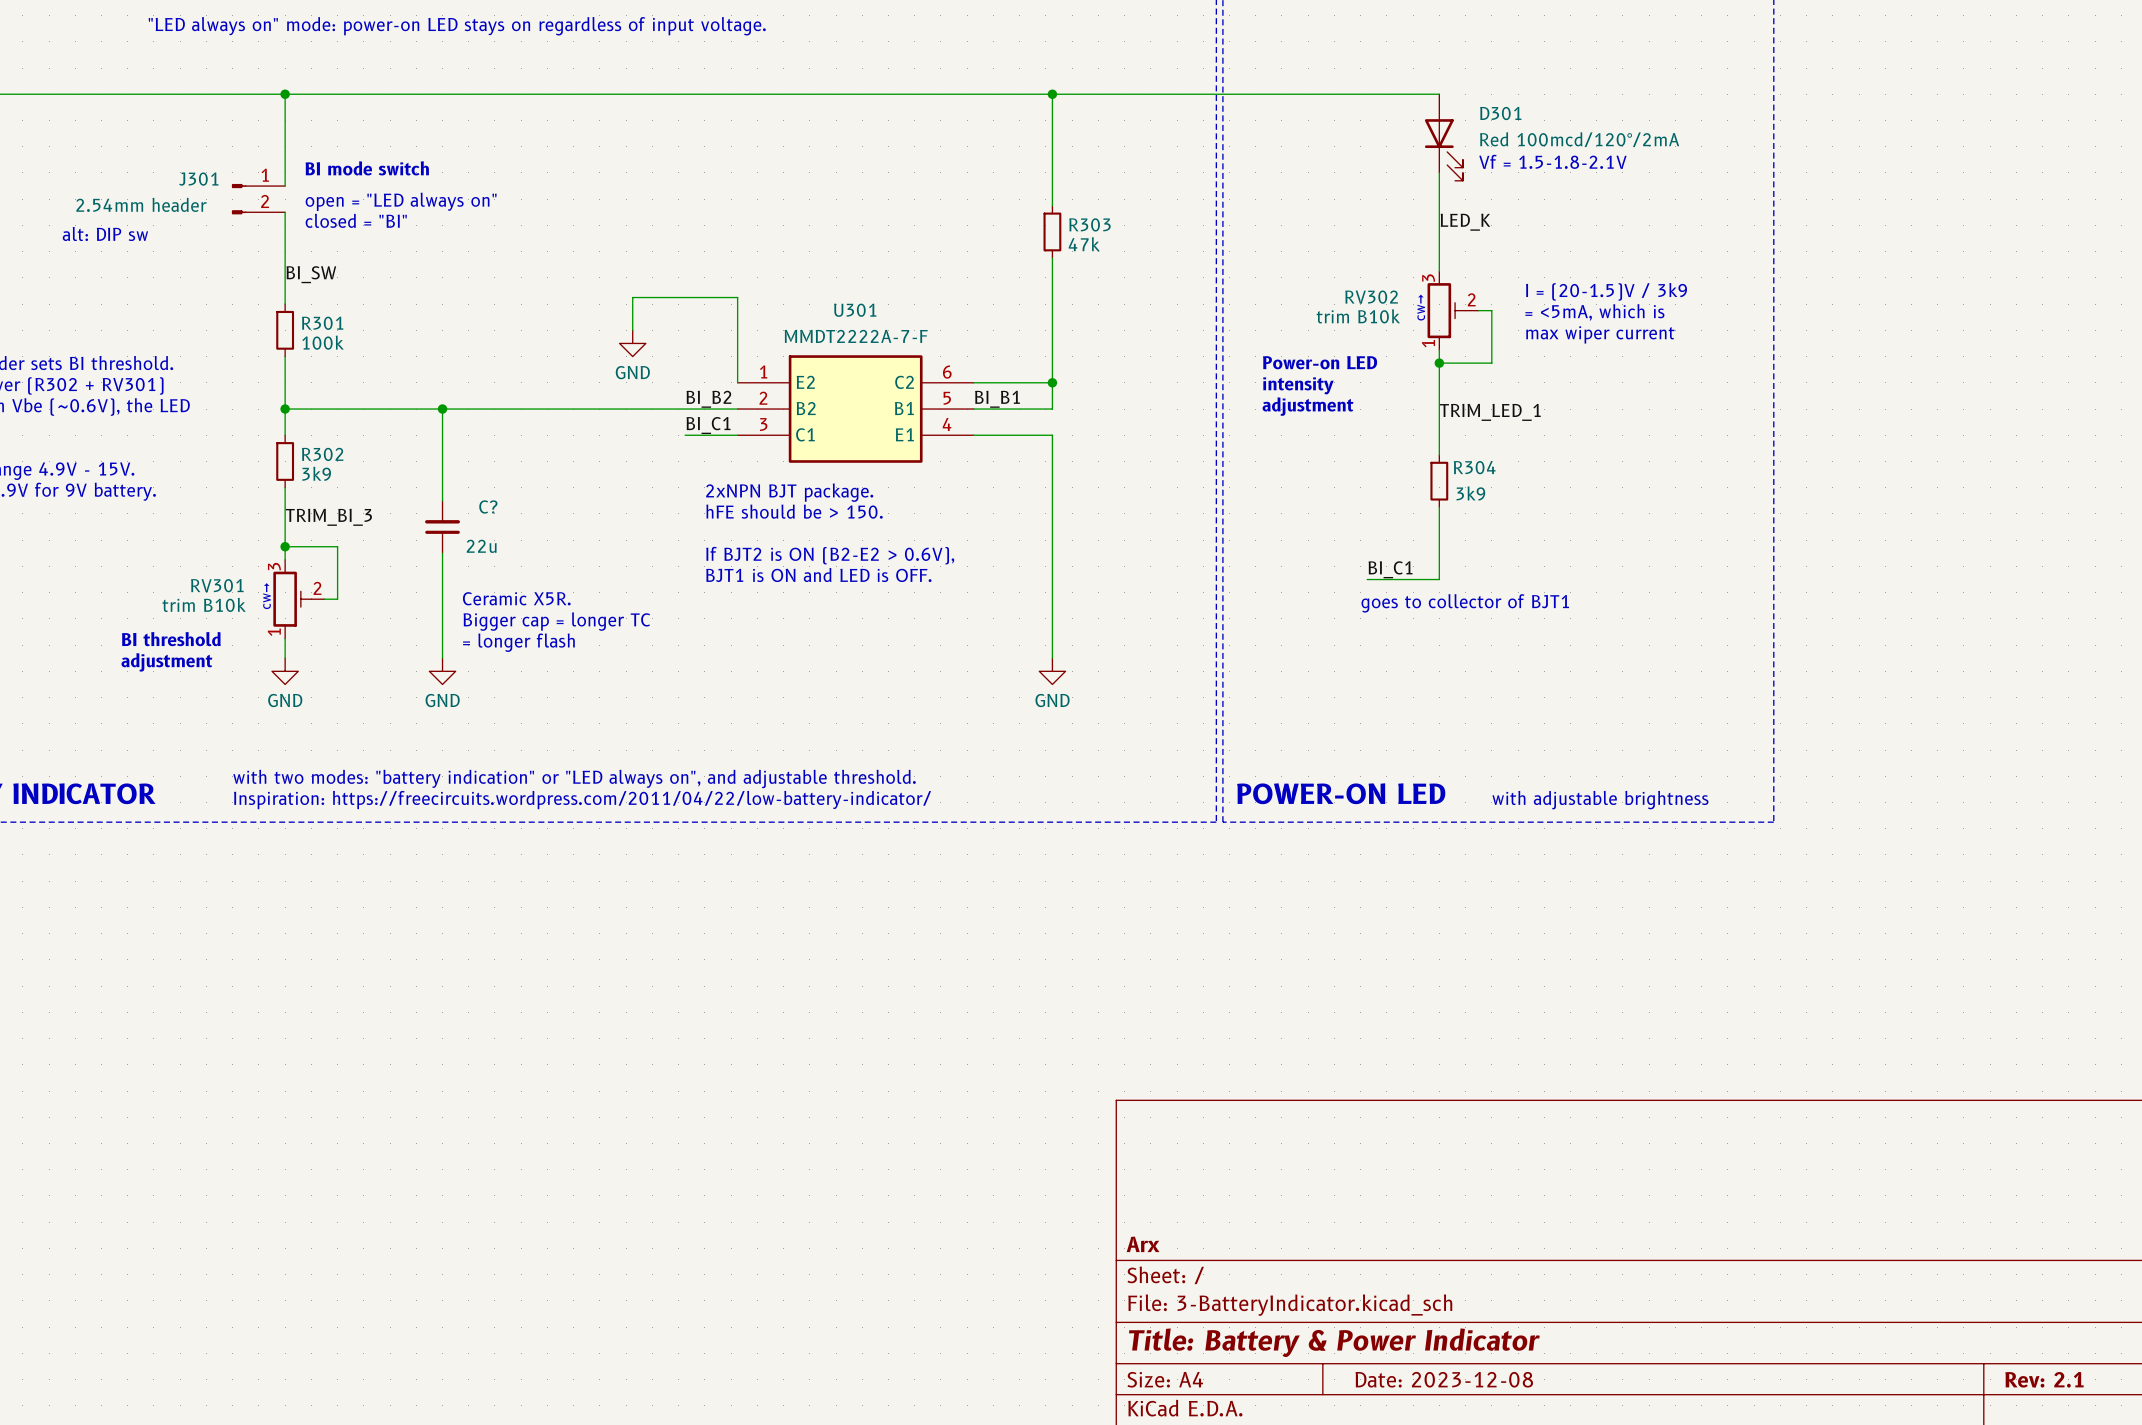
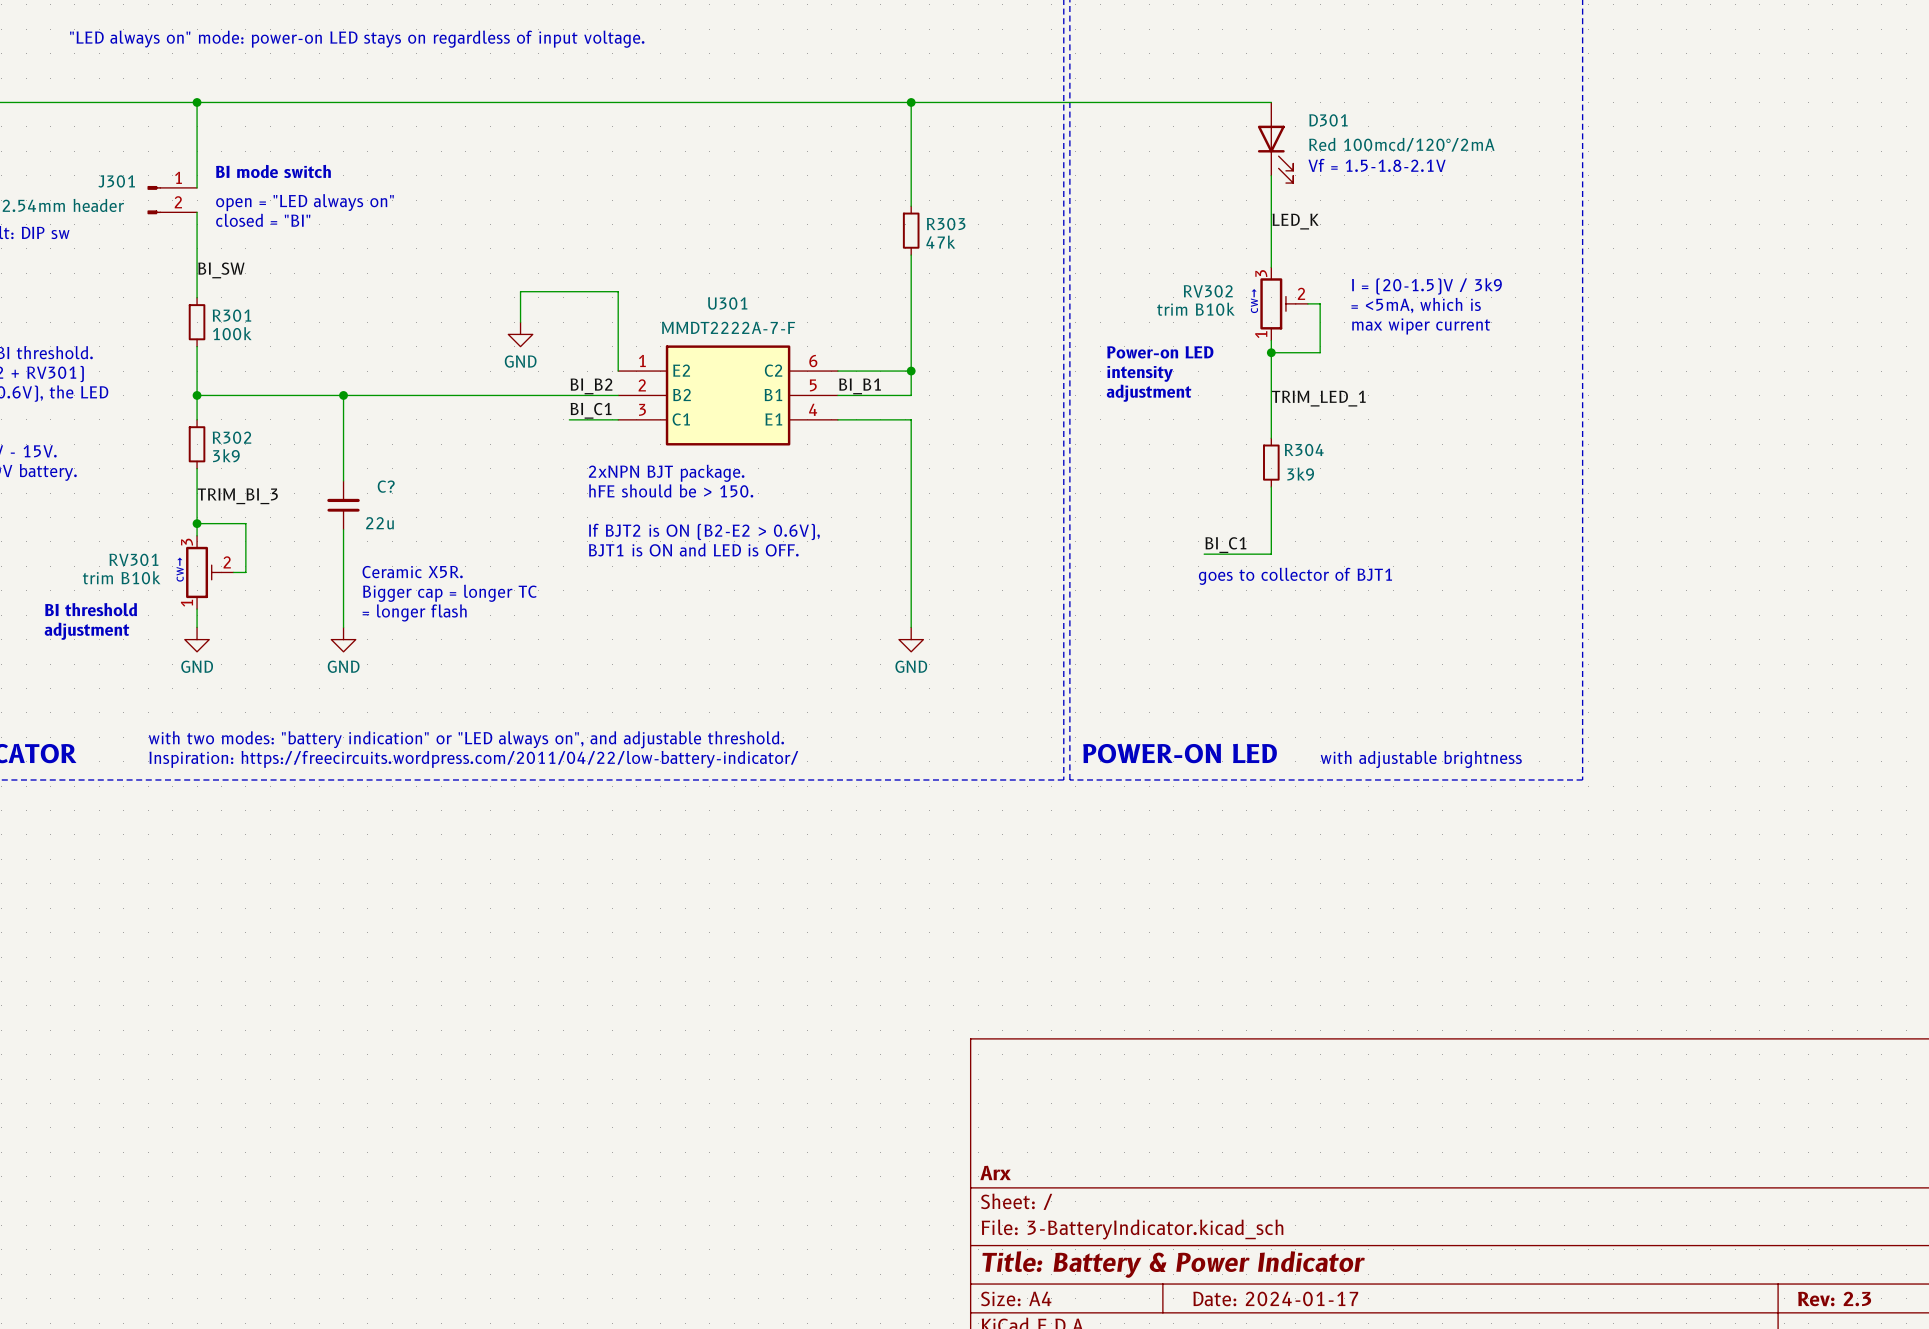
title block: Date: 2023-12-08 (1444, 1379) -> Date: 2024-01-17 (1275, 1298)
title block: Rev: 2.1 (2044, 1379) -> Rev: 2.3 (1834, 1299)

